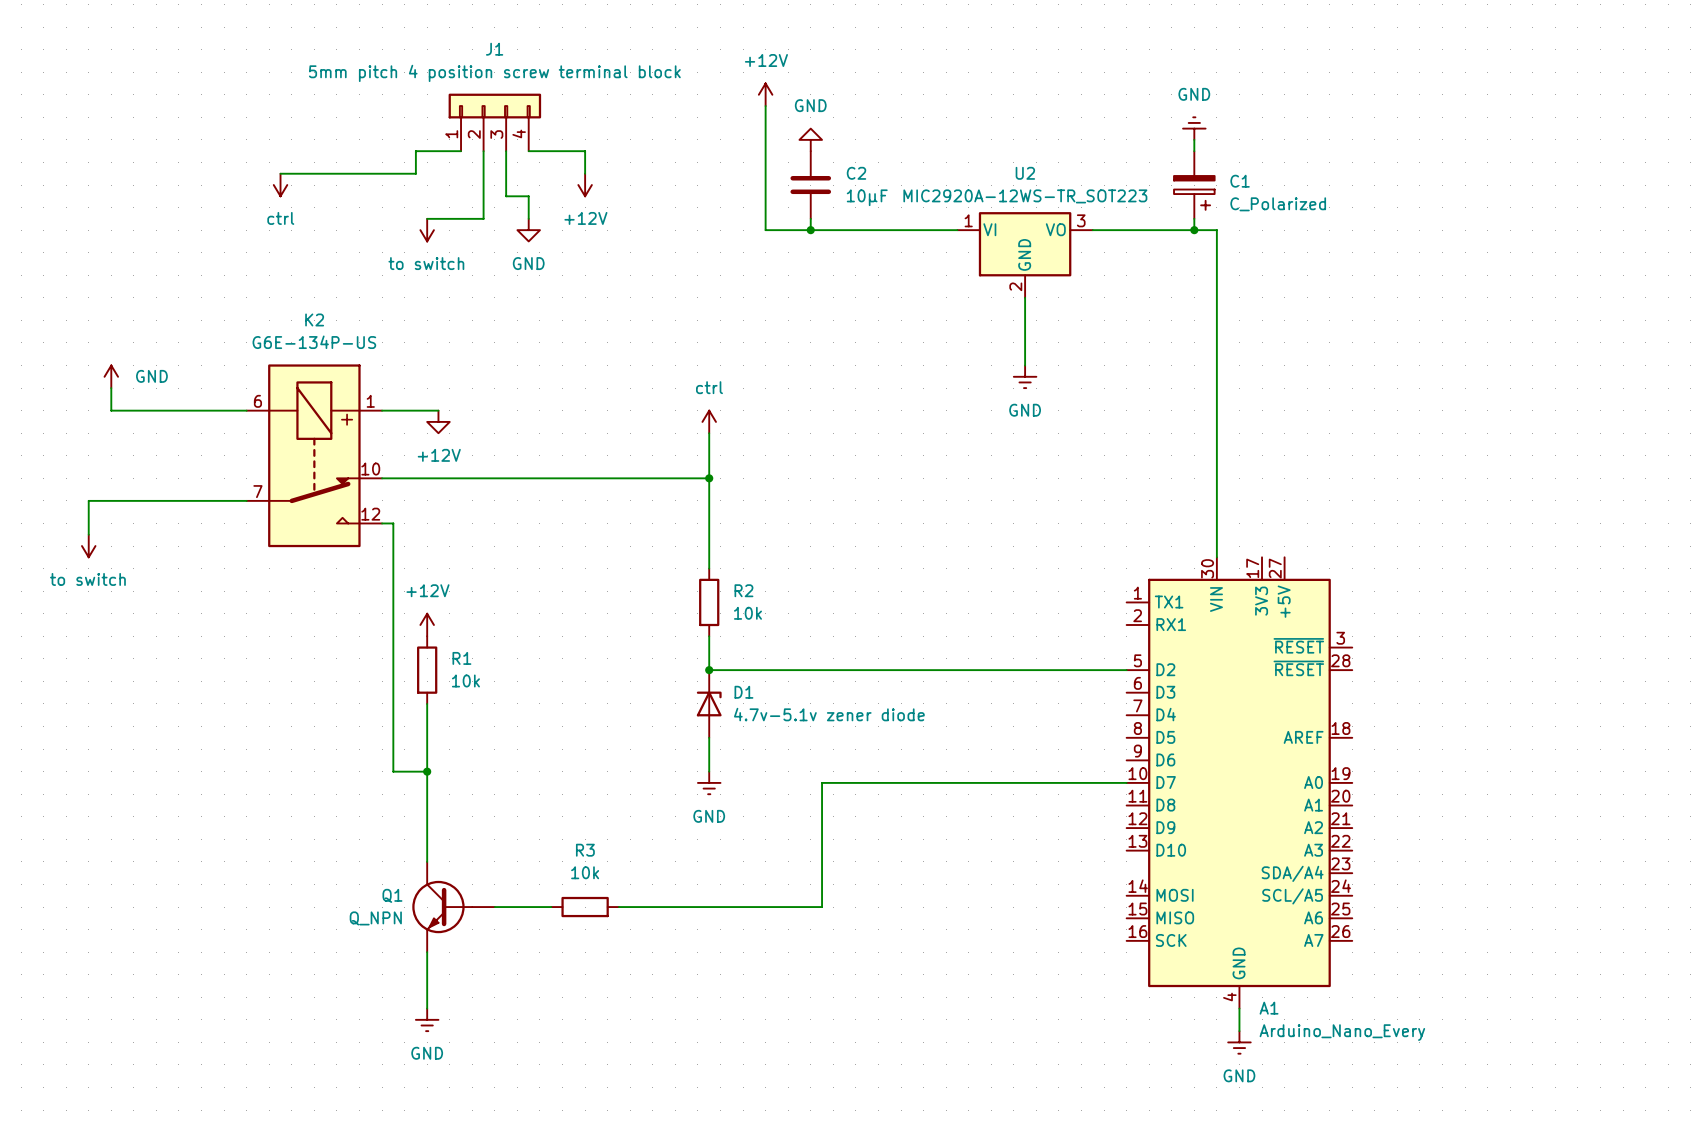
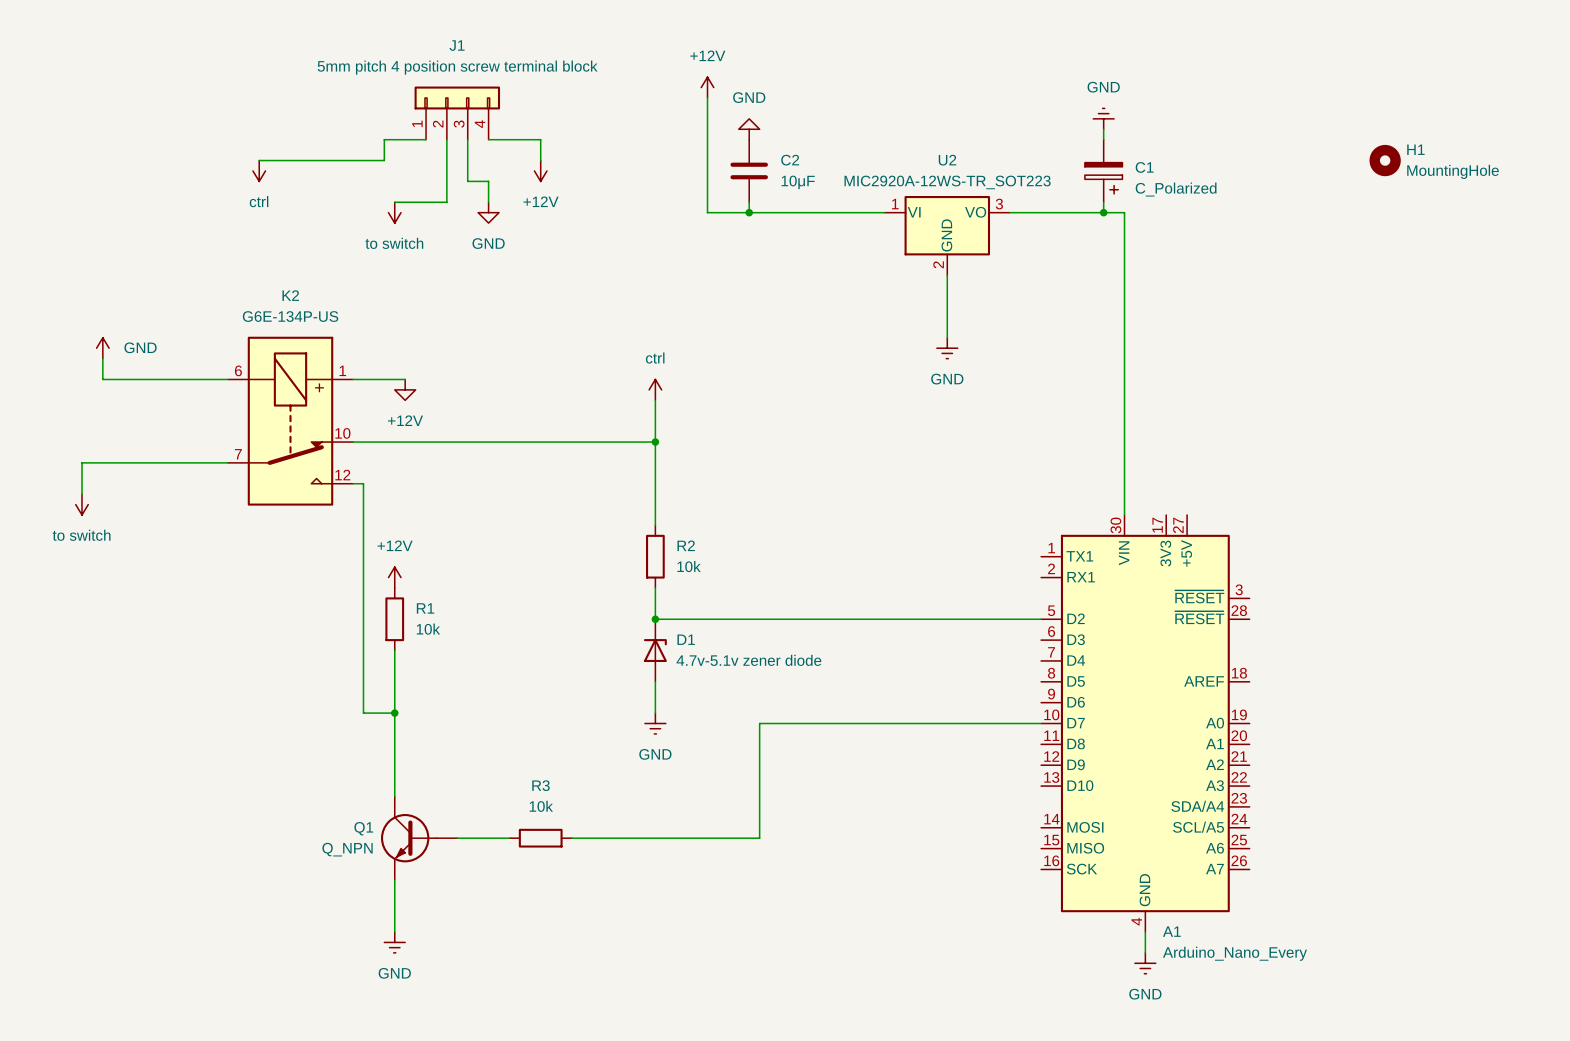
H1: none -> MountingHole (1385, 160)

